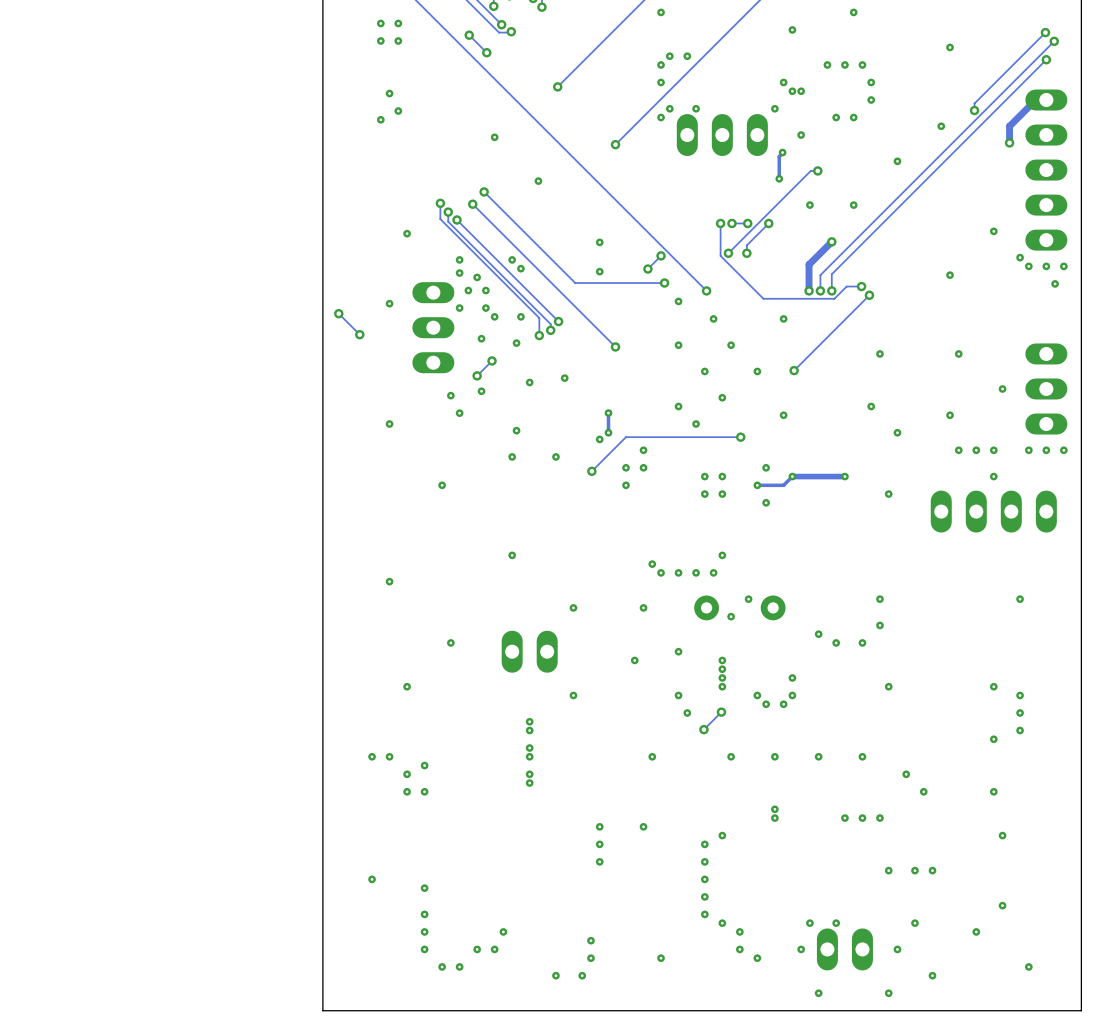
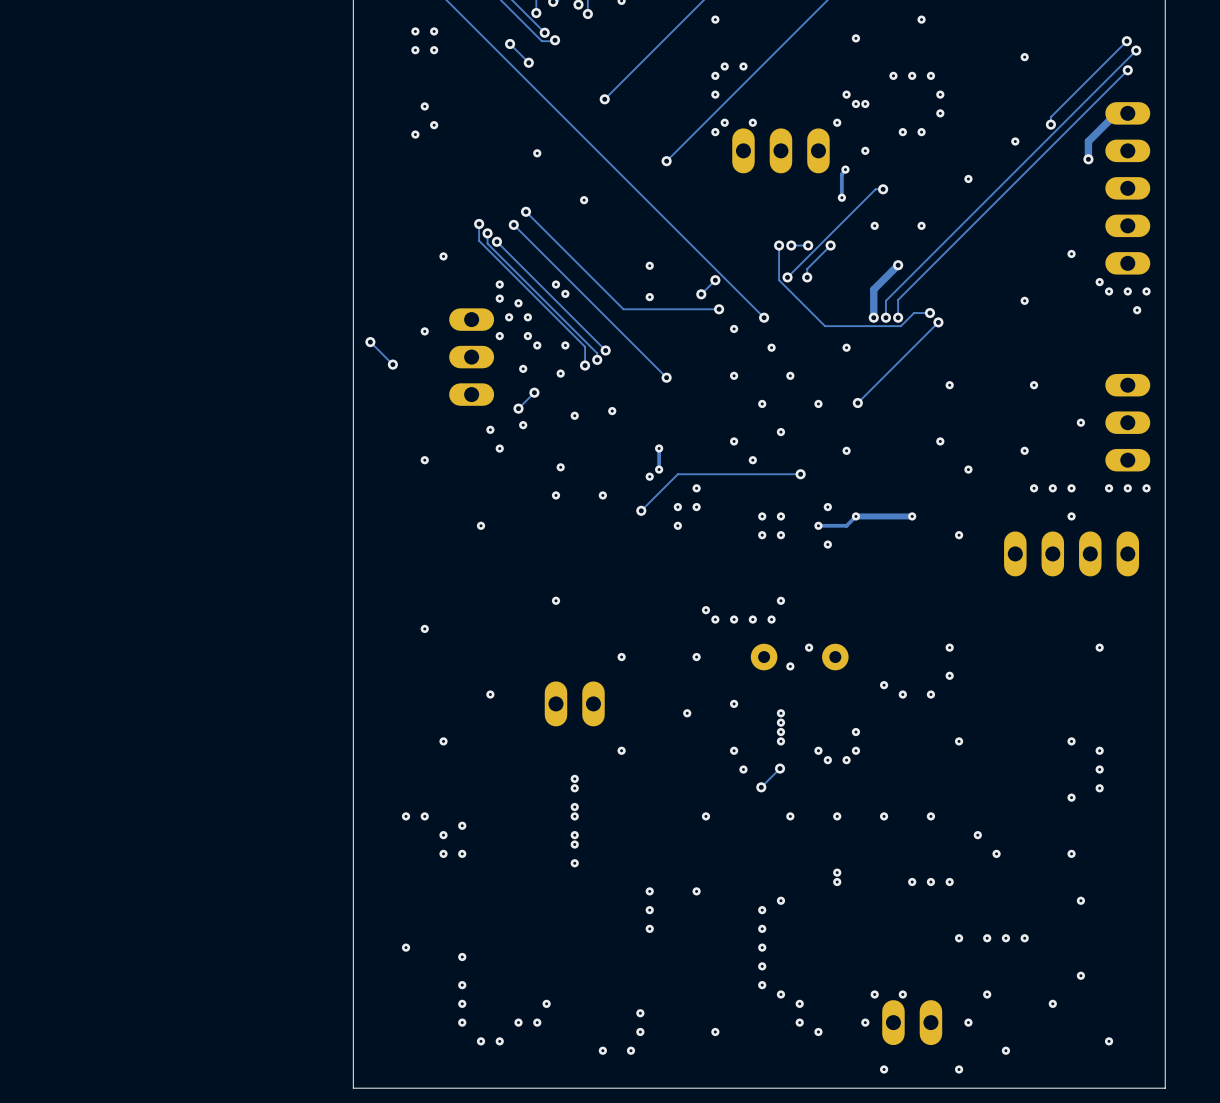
via: none -> (574, 863)
via: none -> (1024, 938)

